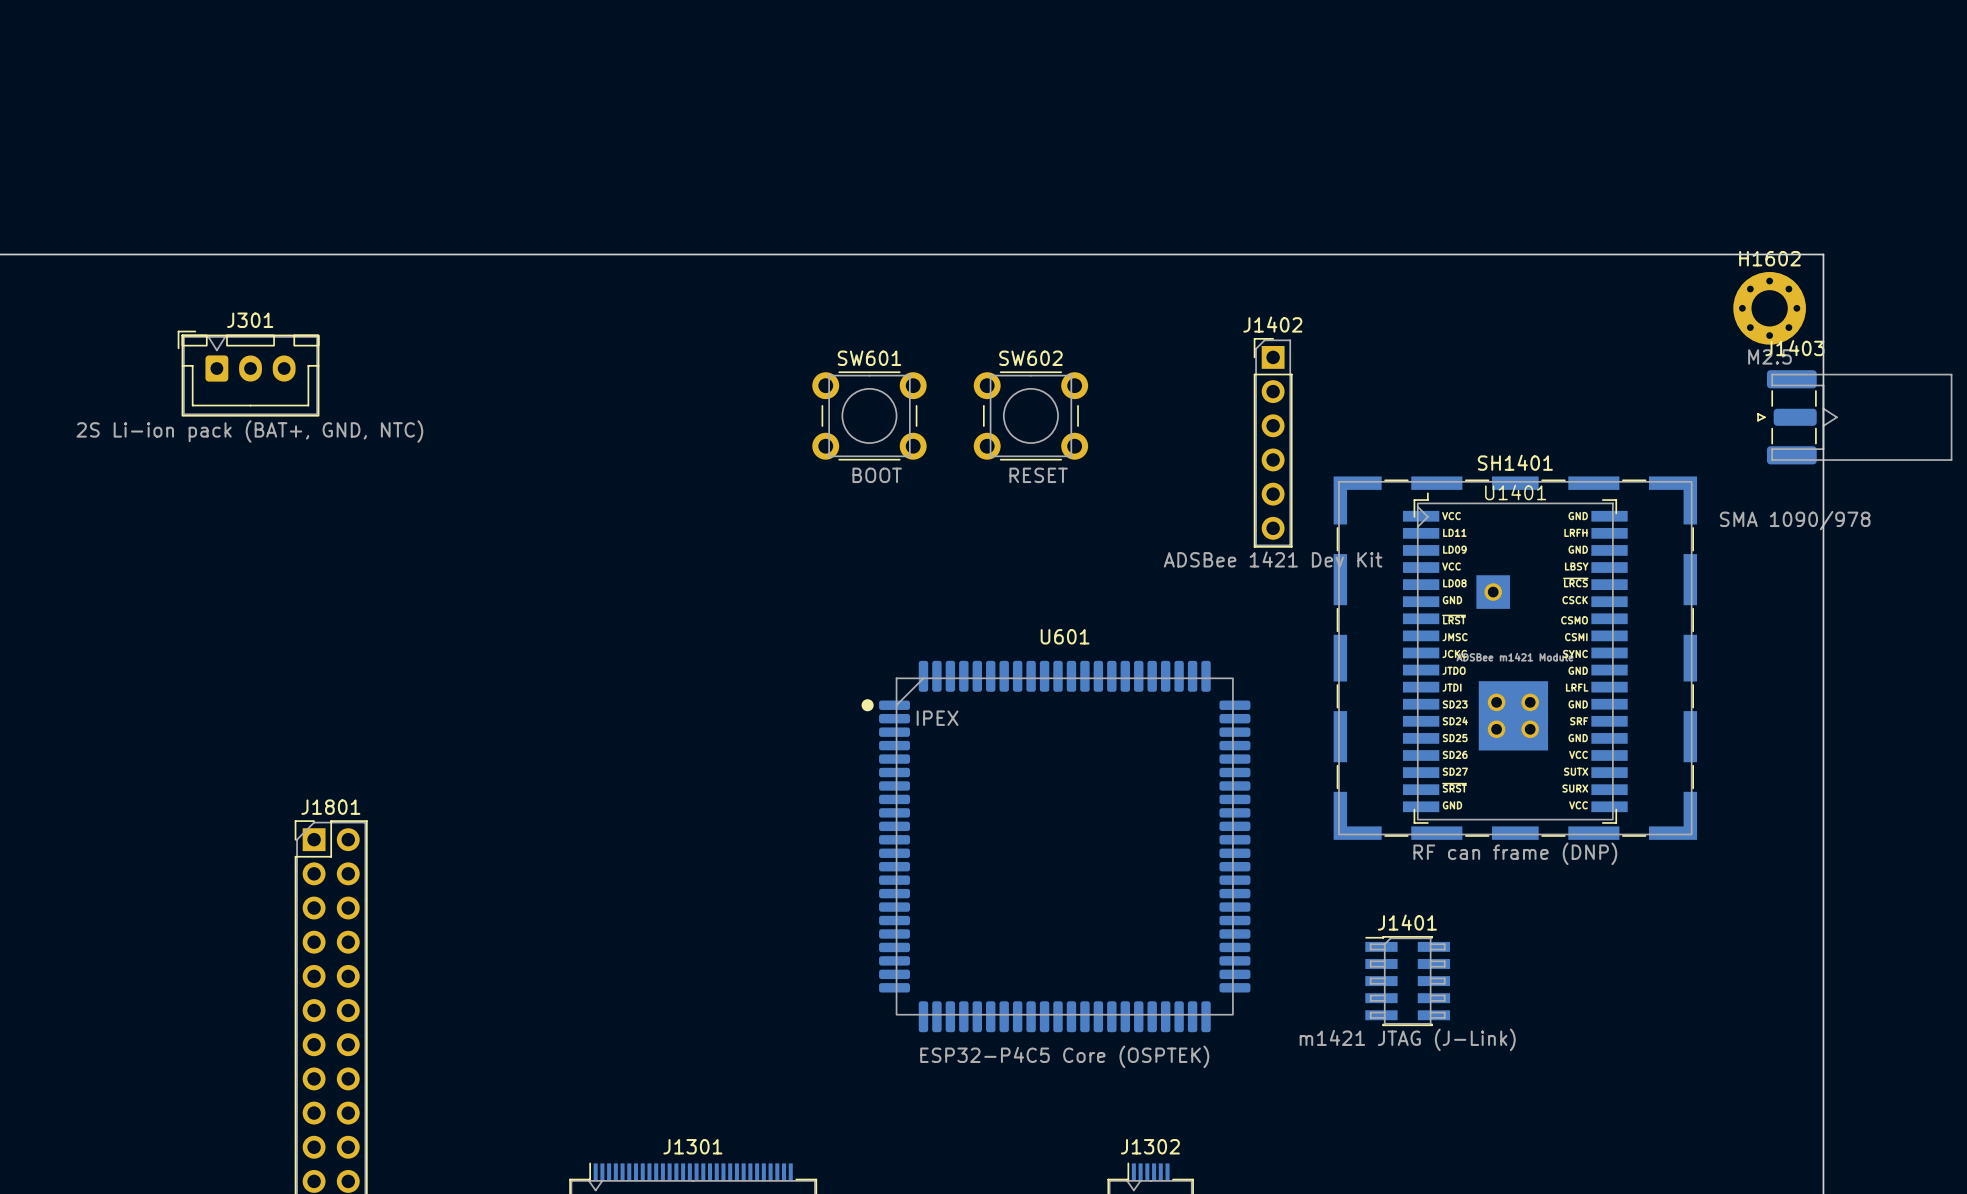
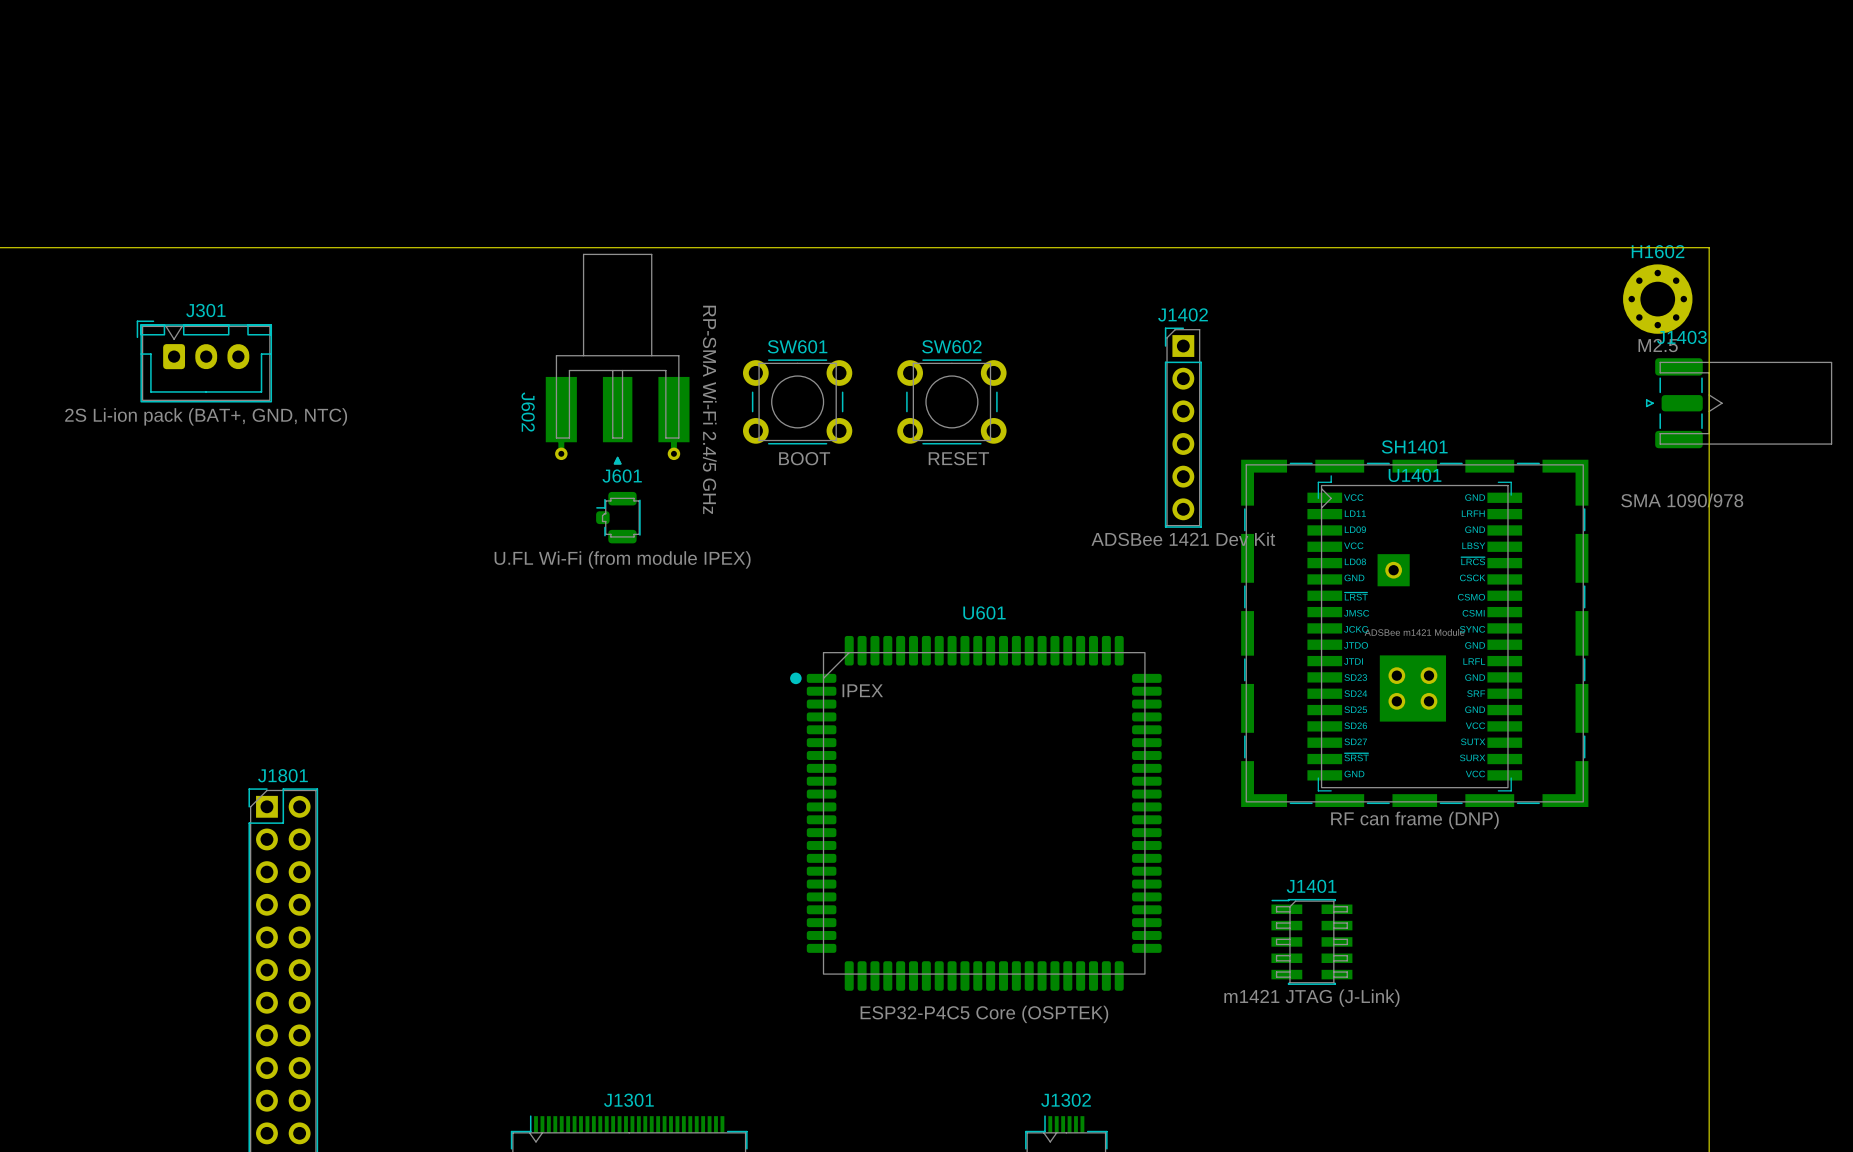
J602: none -> RP-SMA Wi-Fi 2.4/5 GHz (617, 359)
J601: none -> U.FL Wi-Fi (from module IPEX) (618, 517)

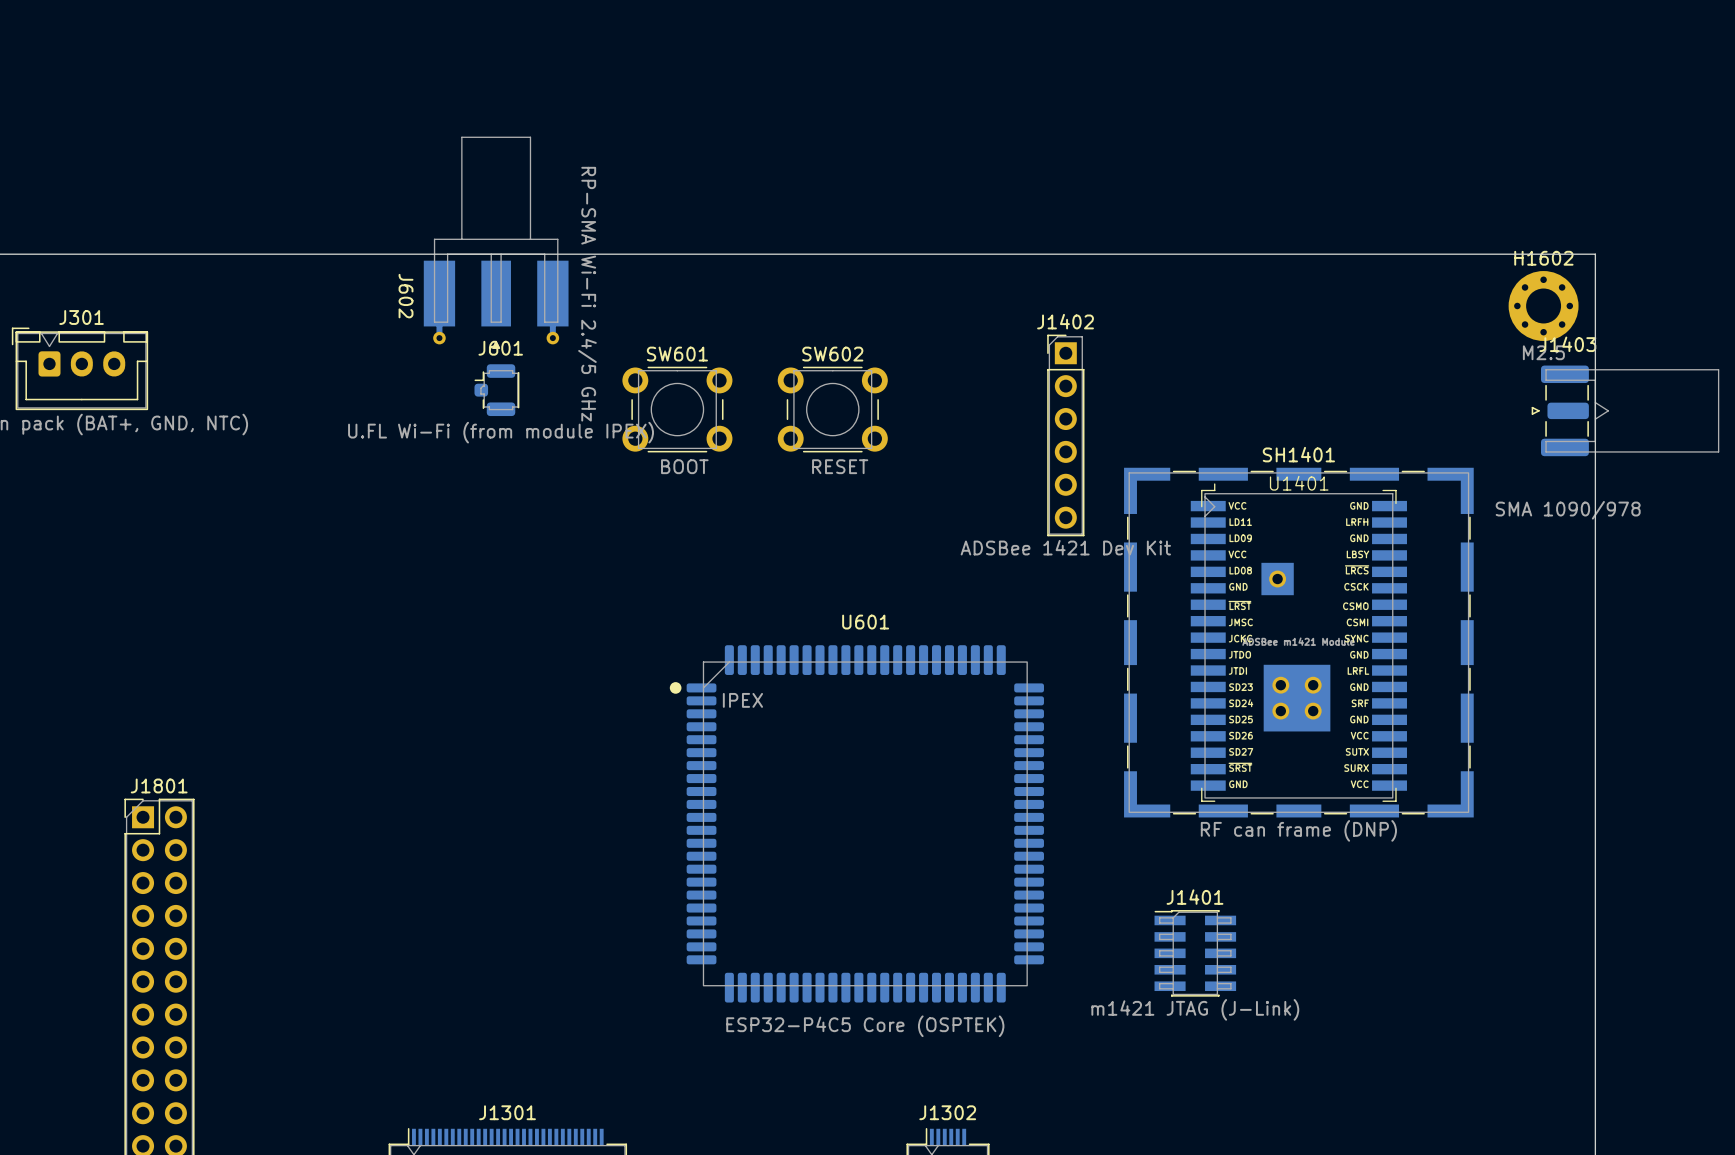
J602 position: (617, 359) -> (496, 242)
J601 position: (618, 517) -> (496, 390)

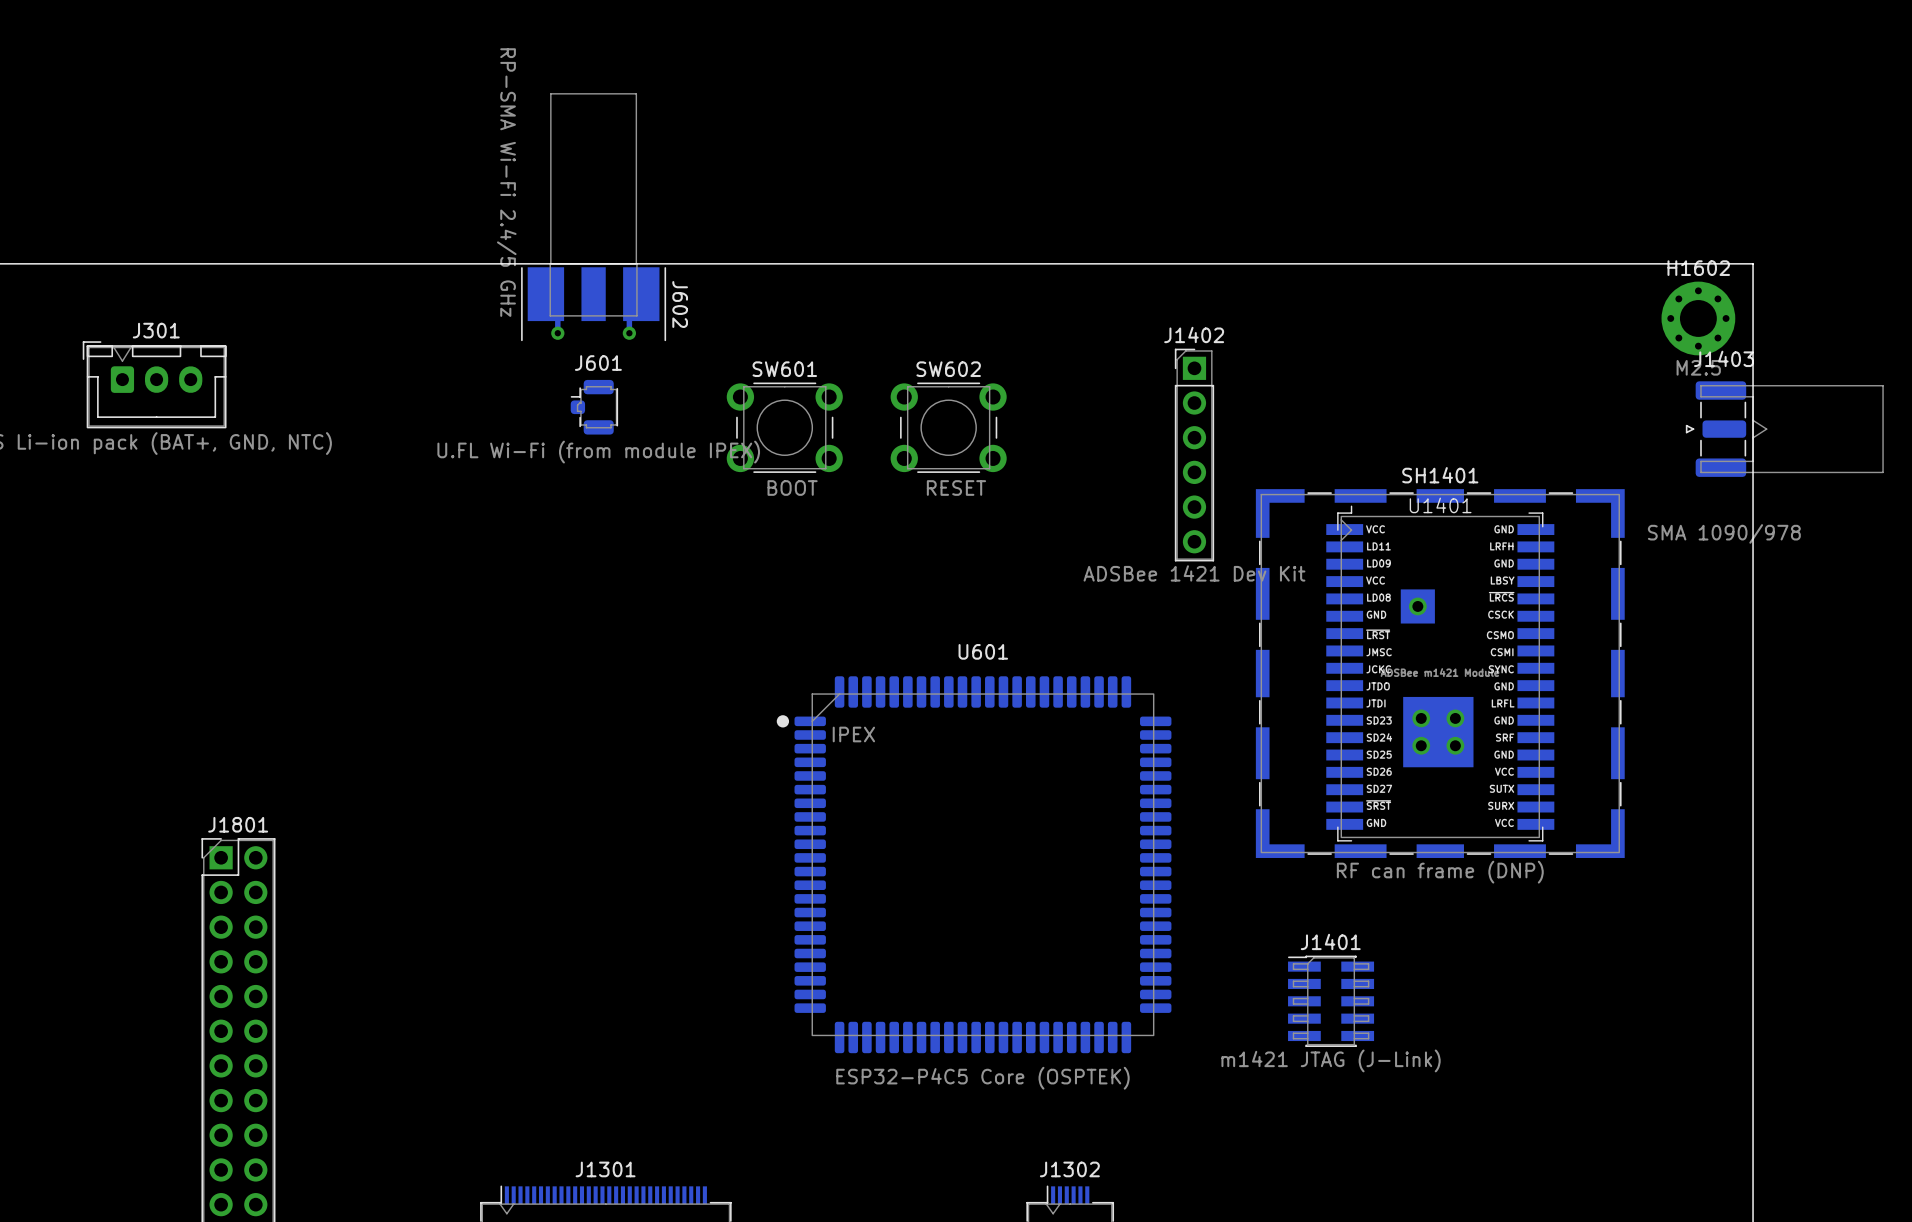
J602 footprint: [423, 136, 569, 349] -> [521, 93, 667, 342]
J602 value position: RP-SMA Wi-Fi 2.4/5 GHz (587, 294) -> RP-SMA Wi-Fi 2.4/5 GHz (506, 182)
J602 name position: J602 (406, 296) -> J602 (680, 304)

